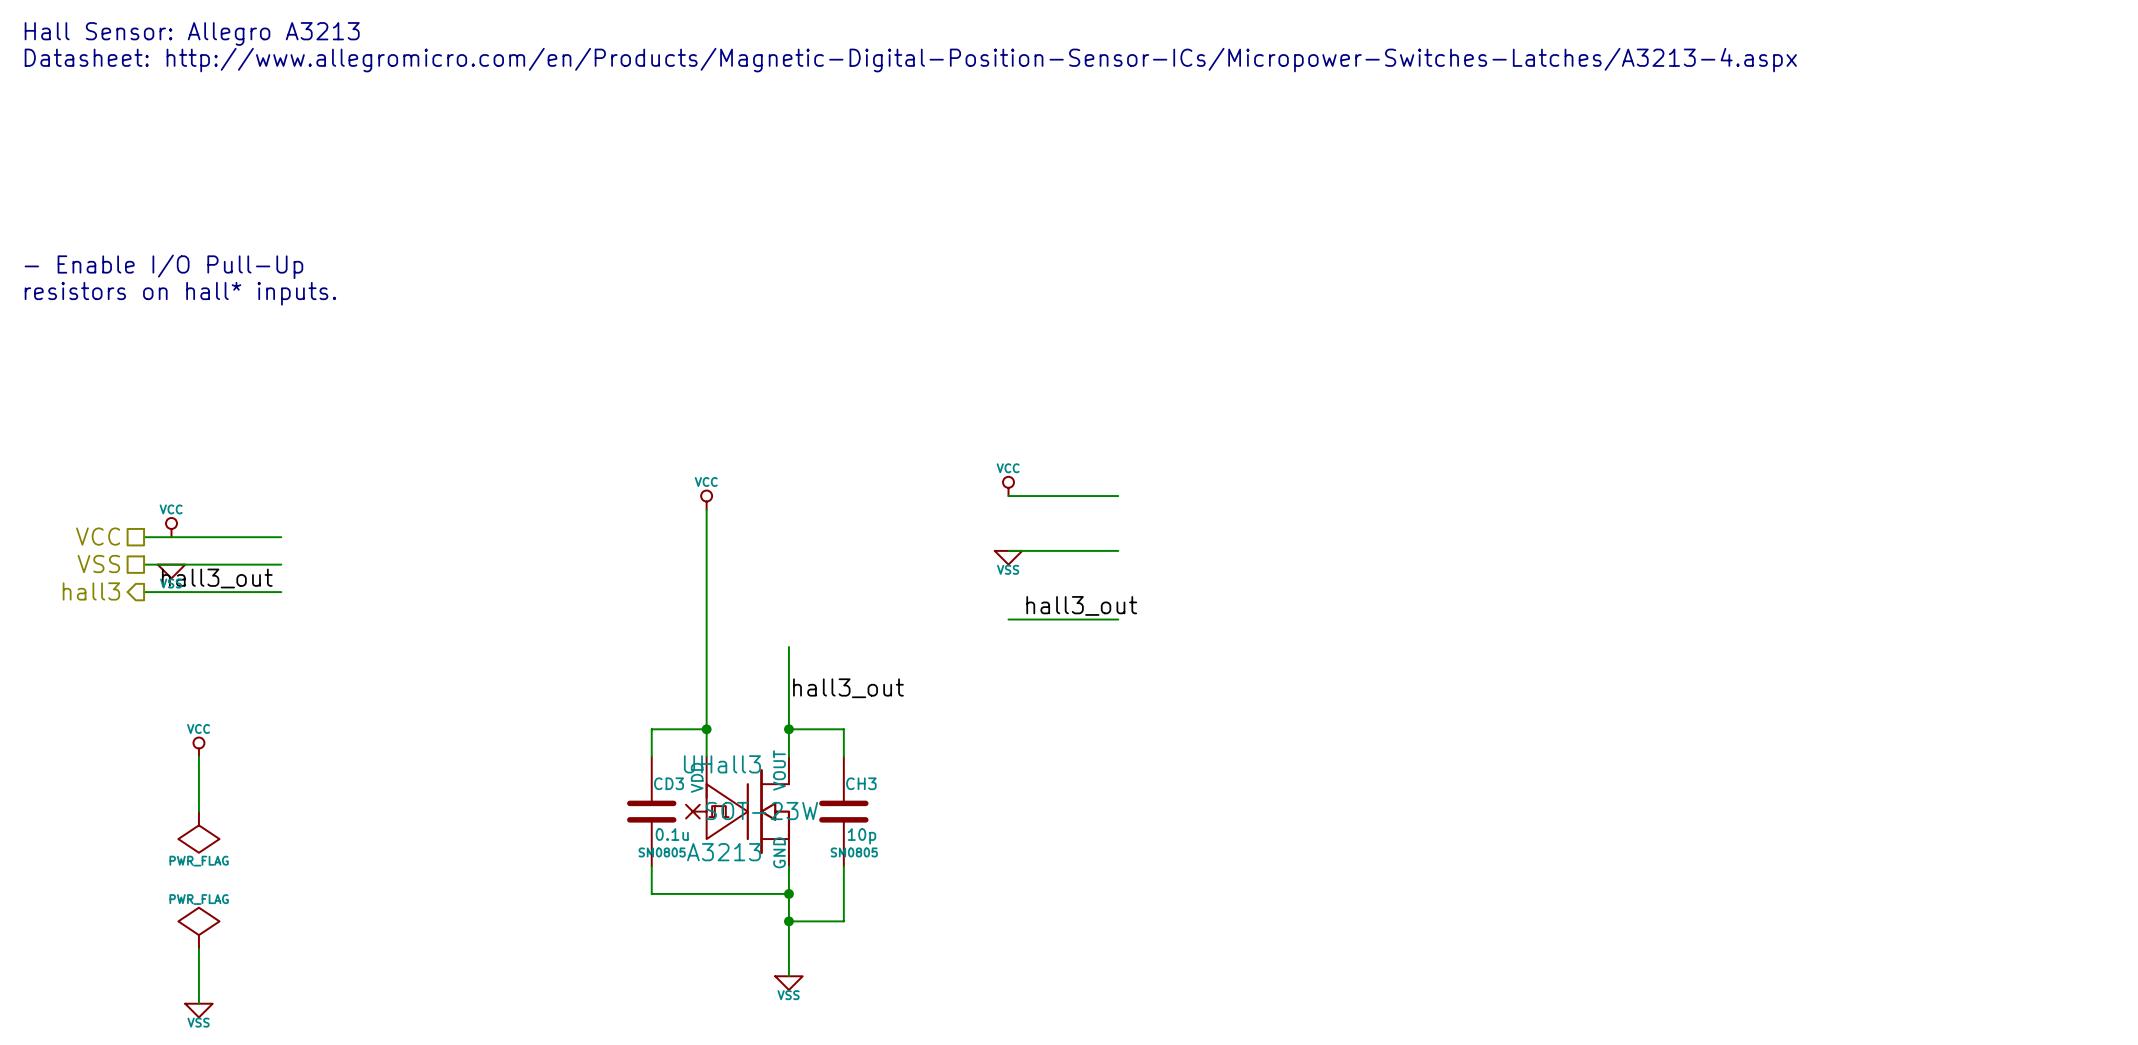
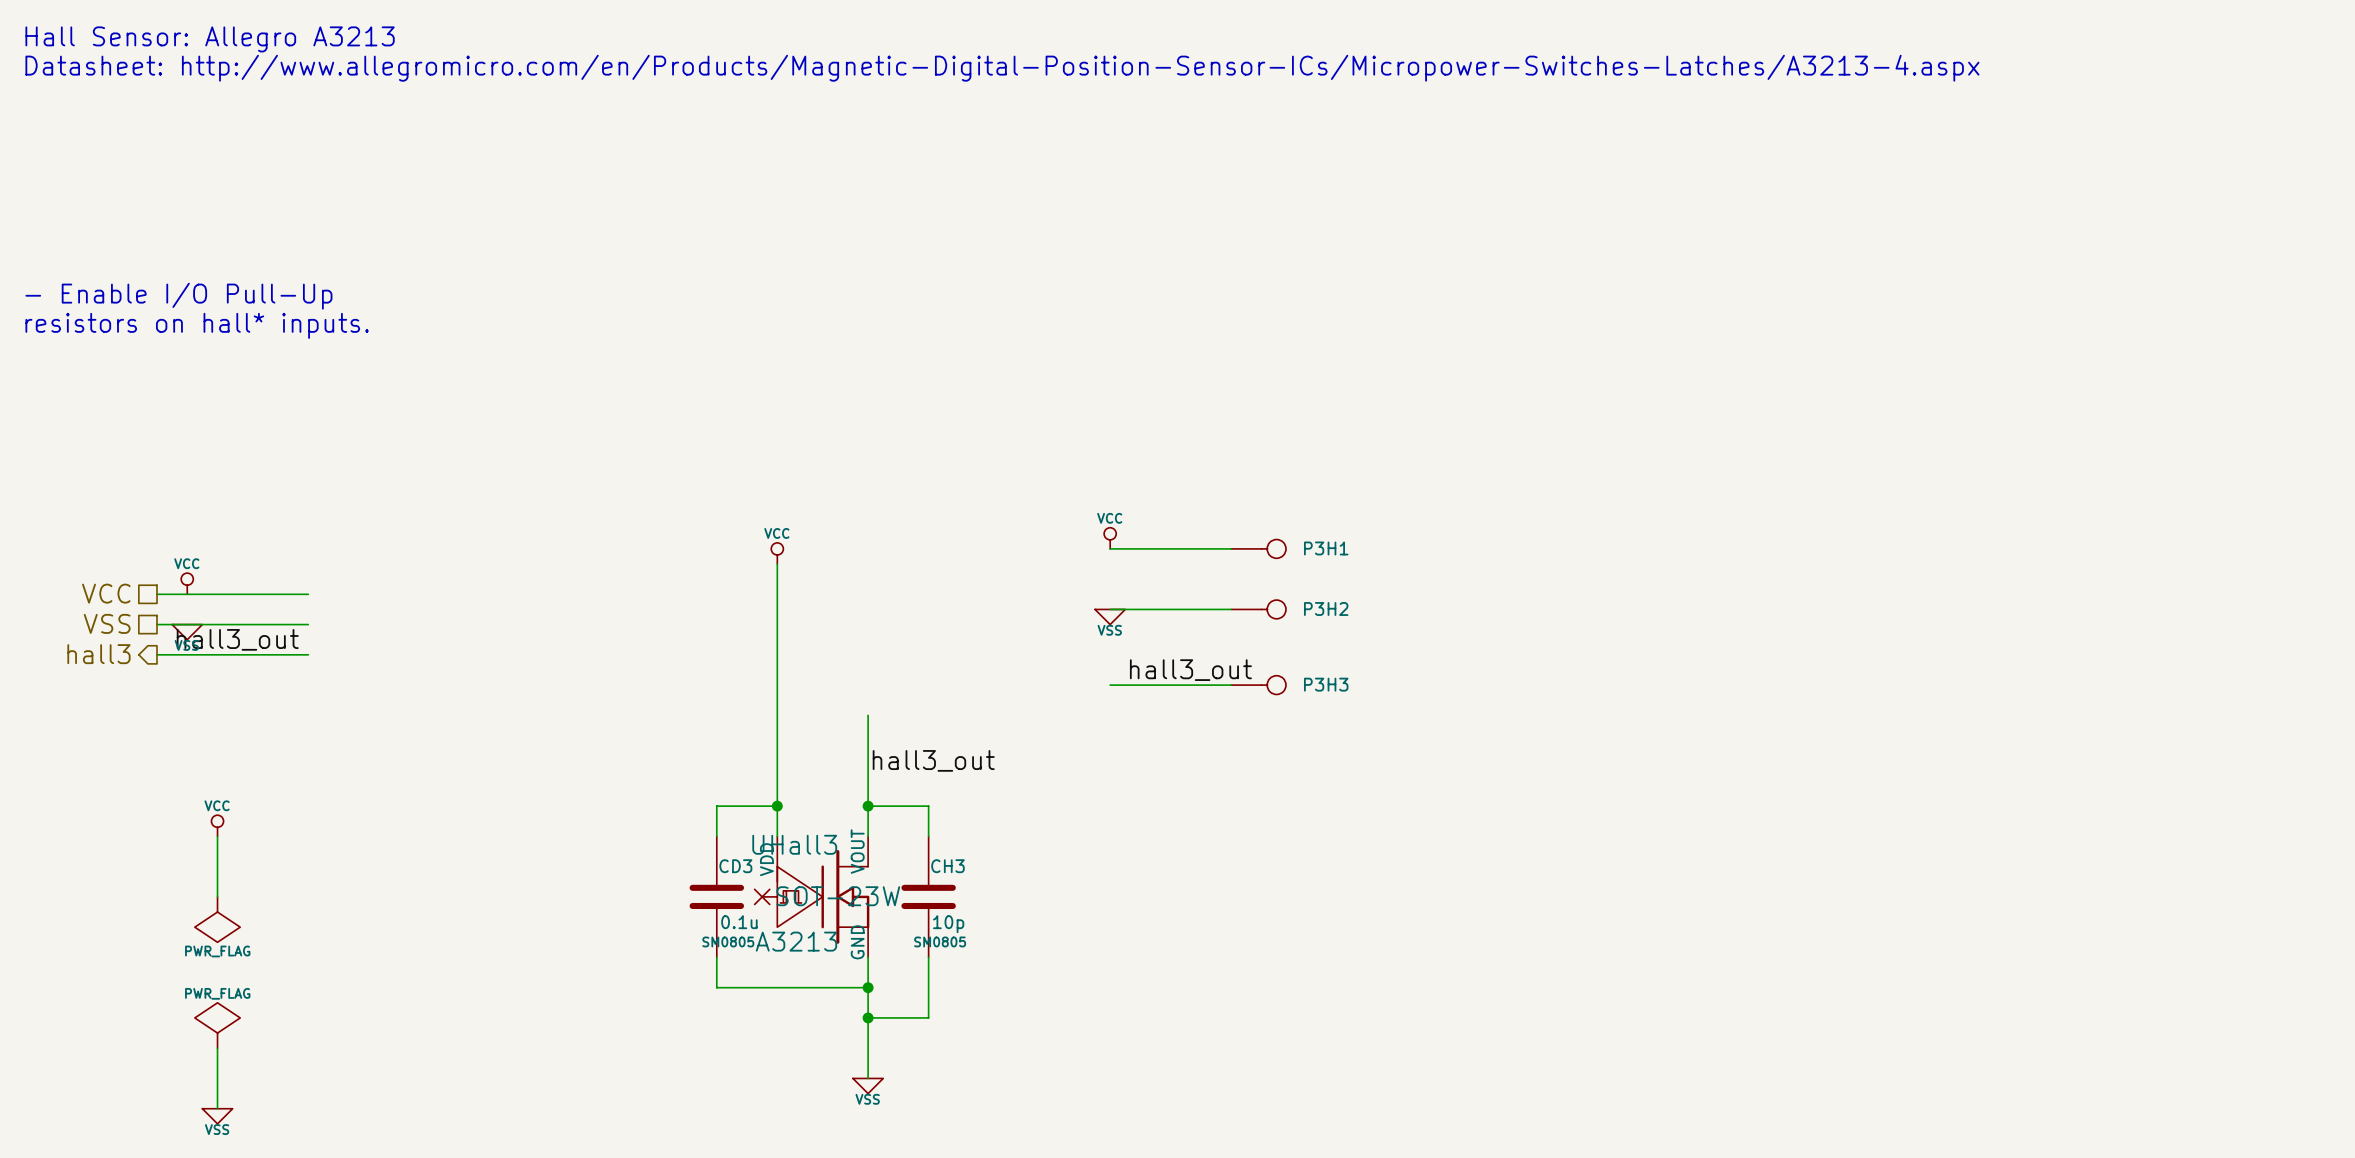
P3H1: none -> (1258, 548)
P3H2: none -> (1258, 609)
P3H3: none -> (1258, 685)

